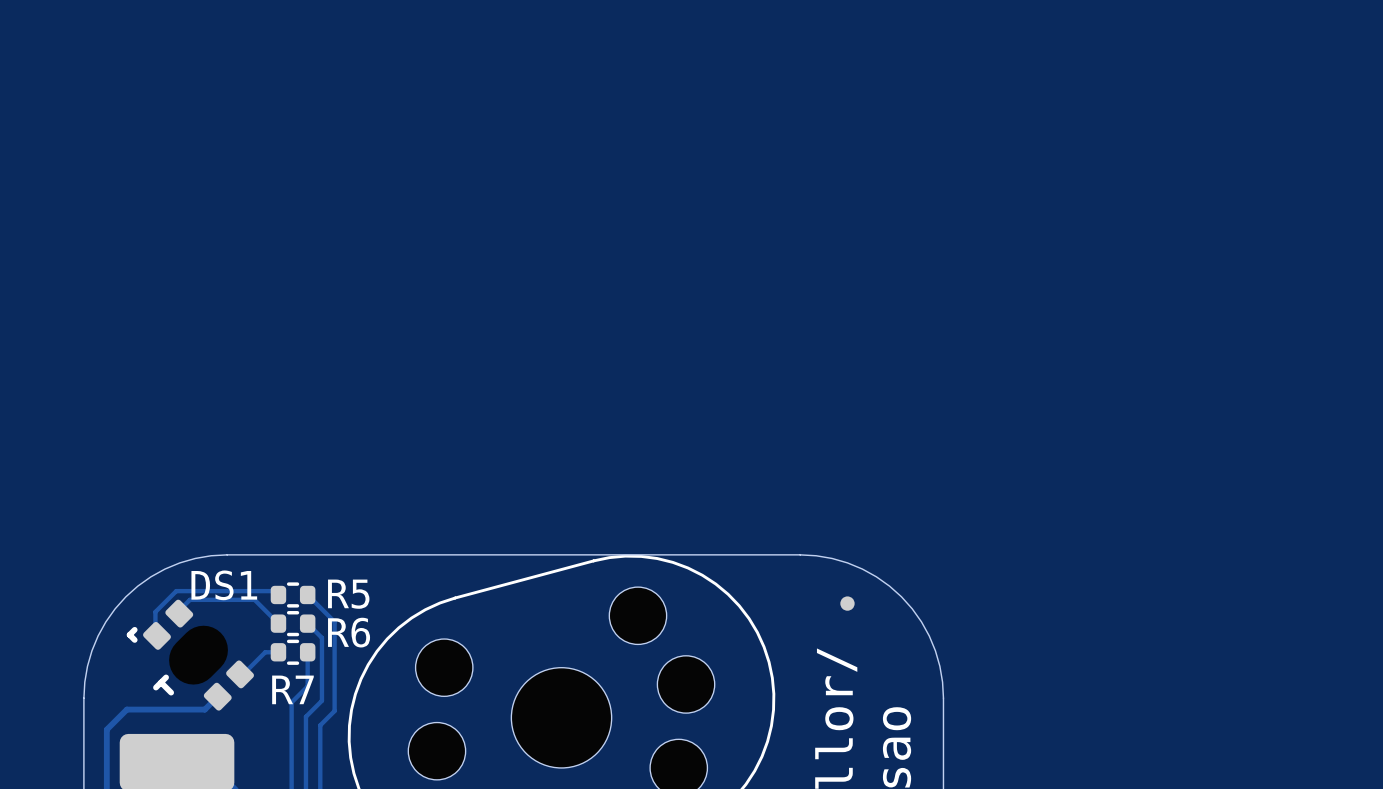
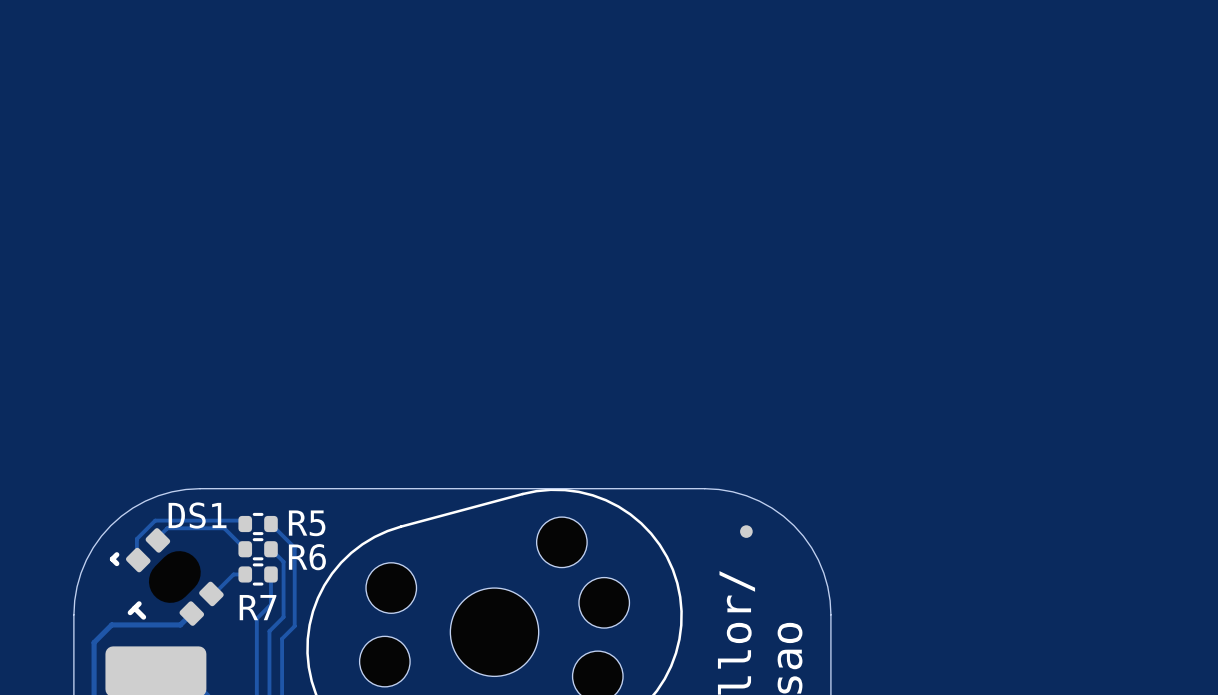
DS1 footprint: [126, 599, 255, 711] -> [109, 528, 224, 626]

